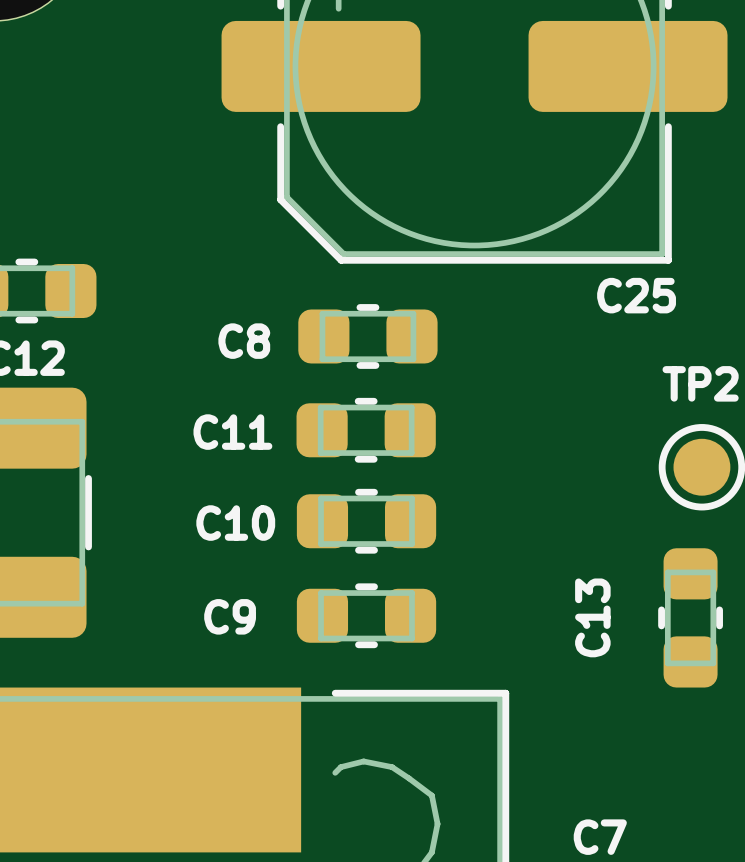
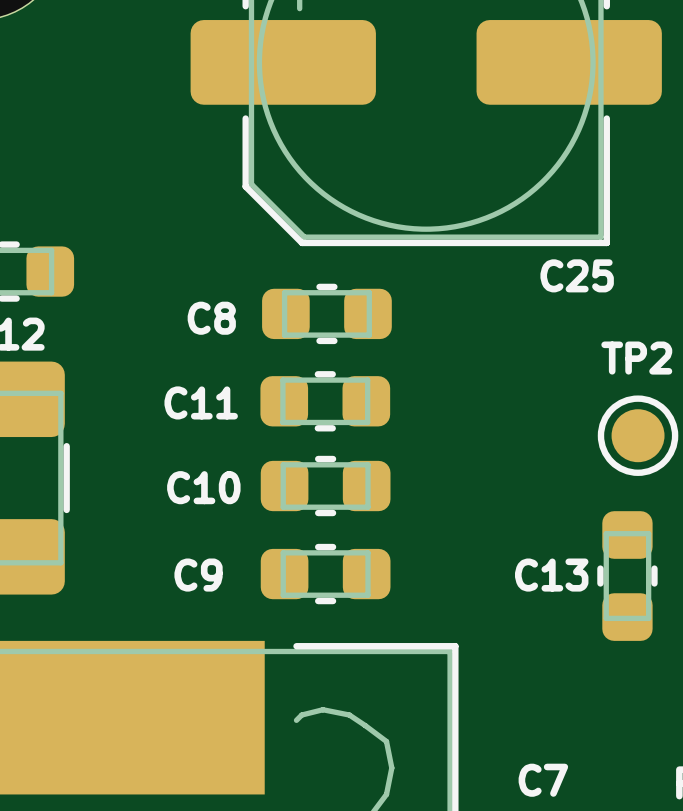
C13 name rotation: 0° (592, 617) -> 90° clockwise (551, 575)

